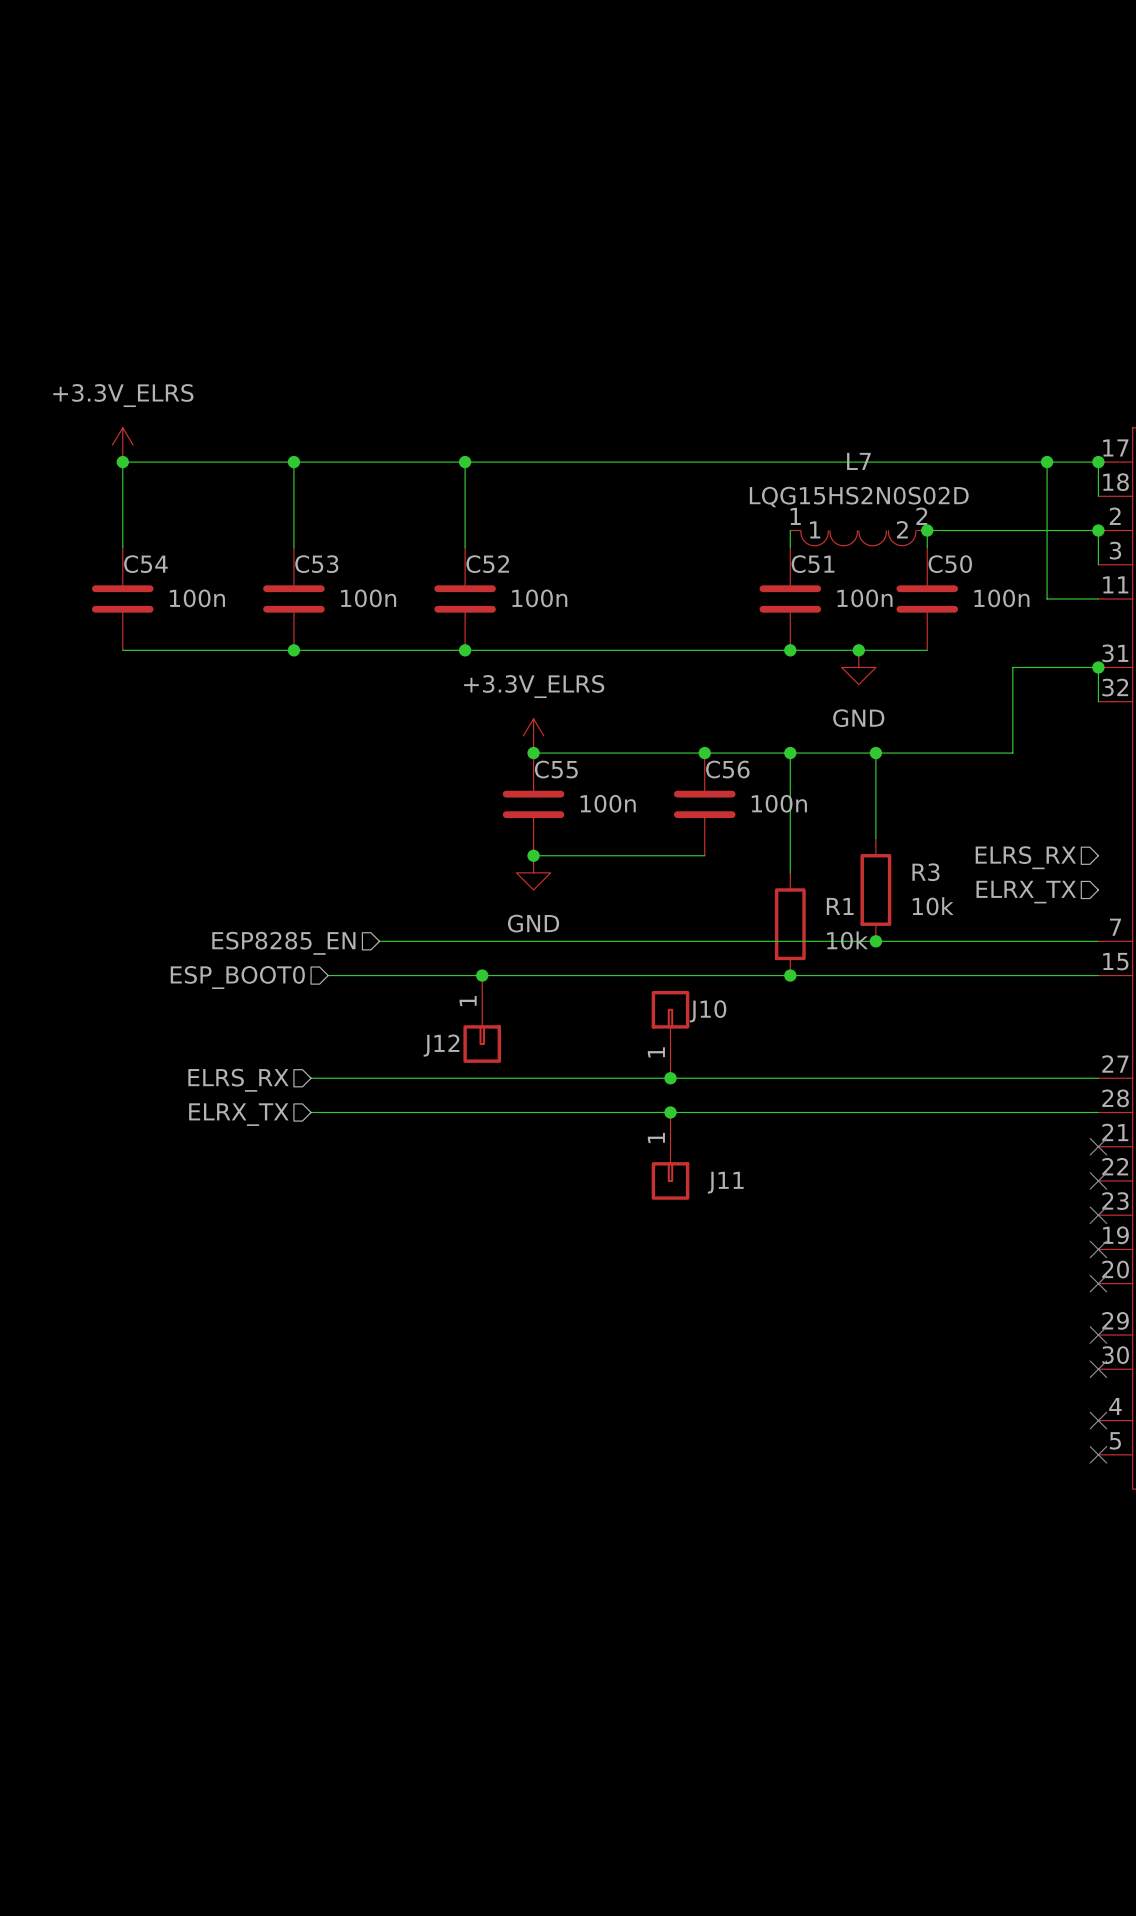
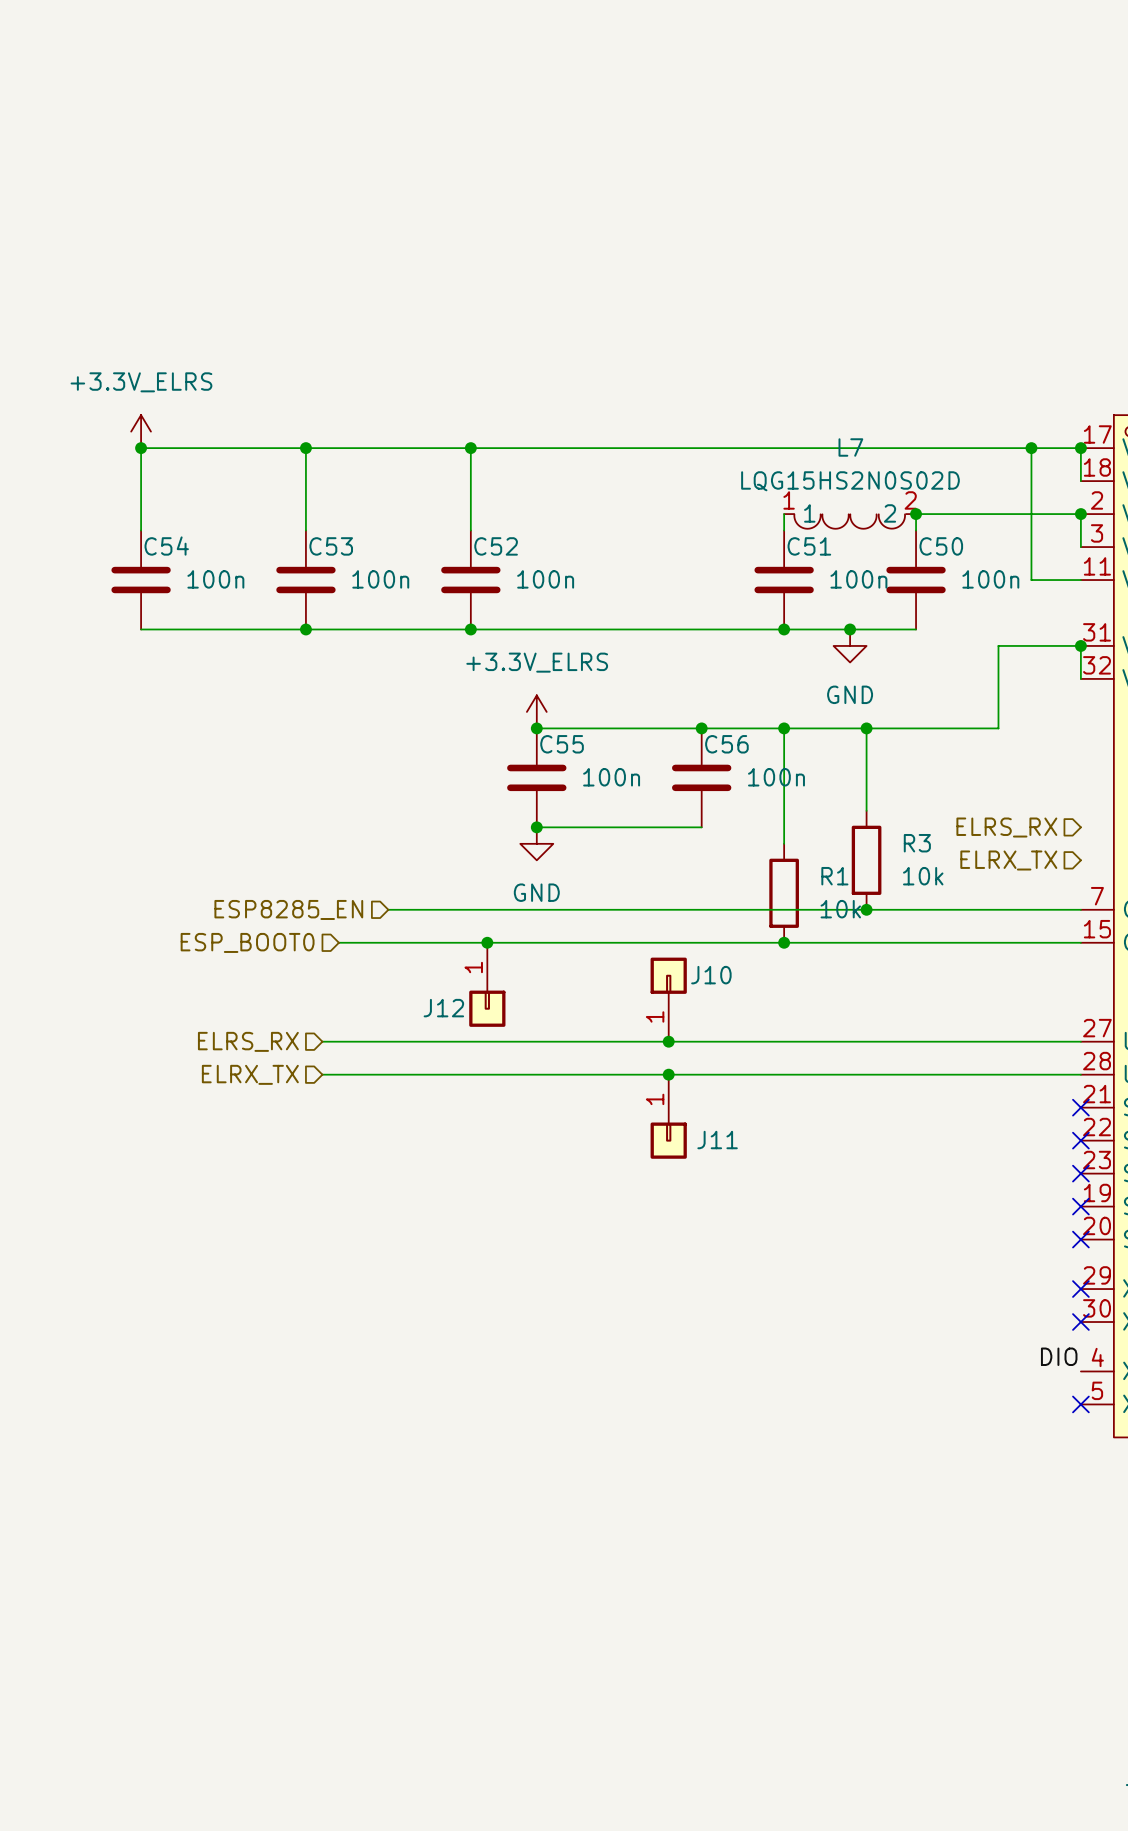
label: none -> DIO (1059, 1356)
no-connect mark: (1098, 1420) -> none

